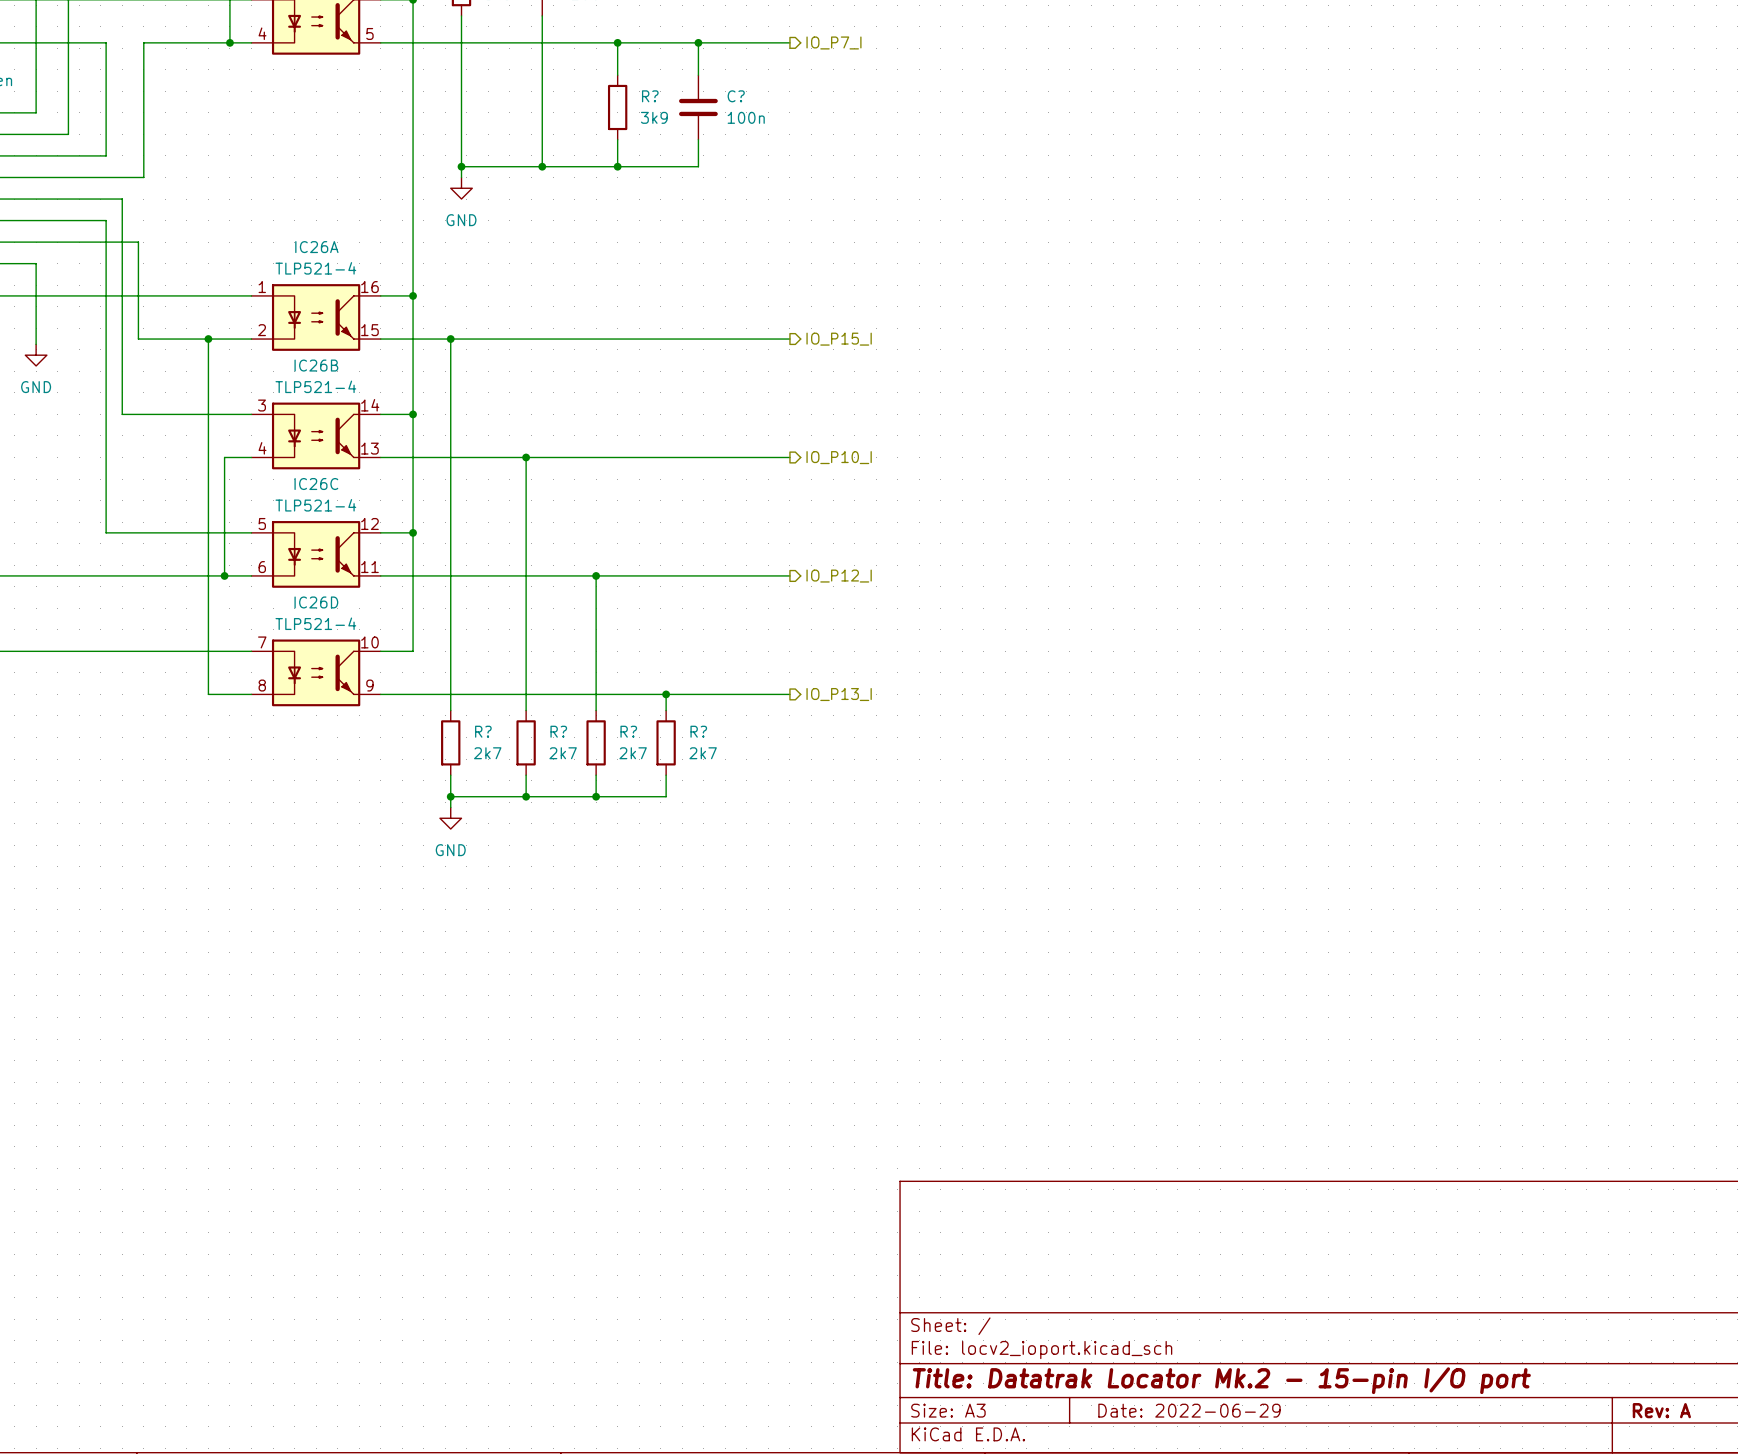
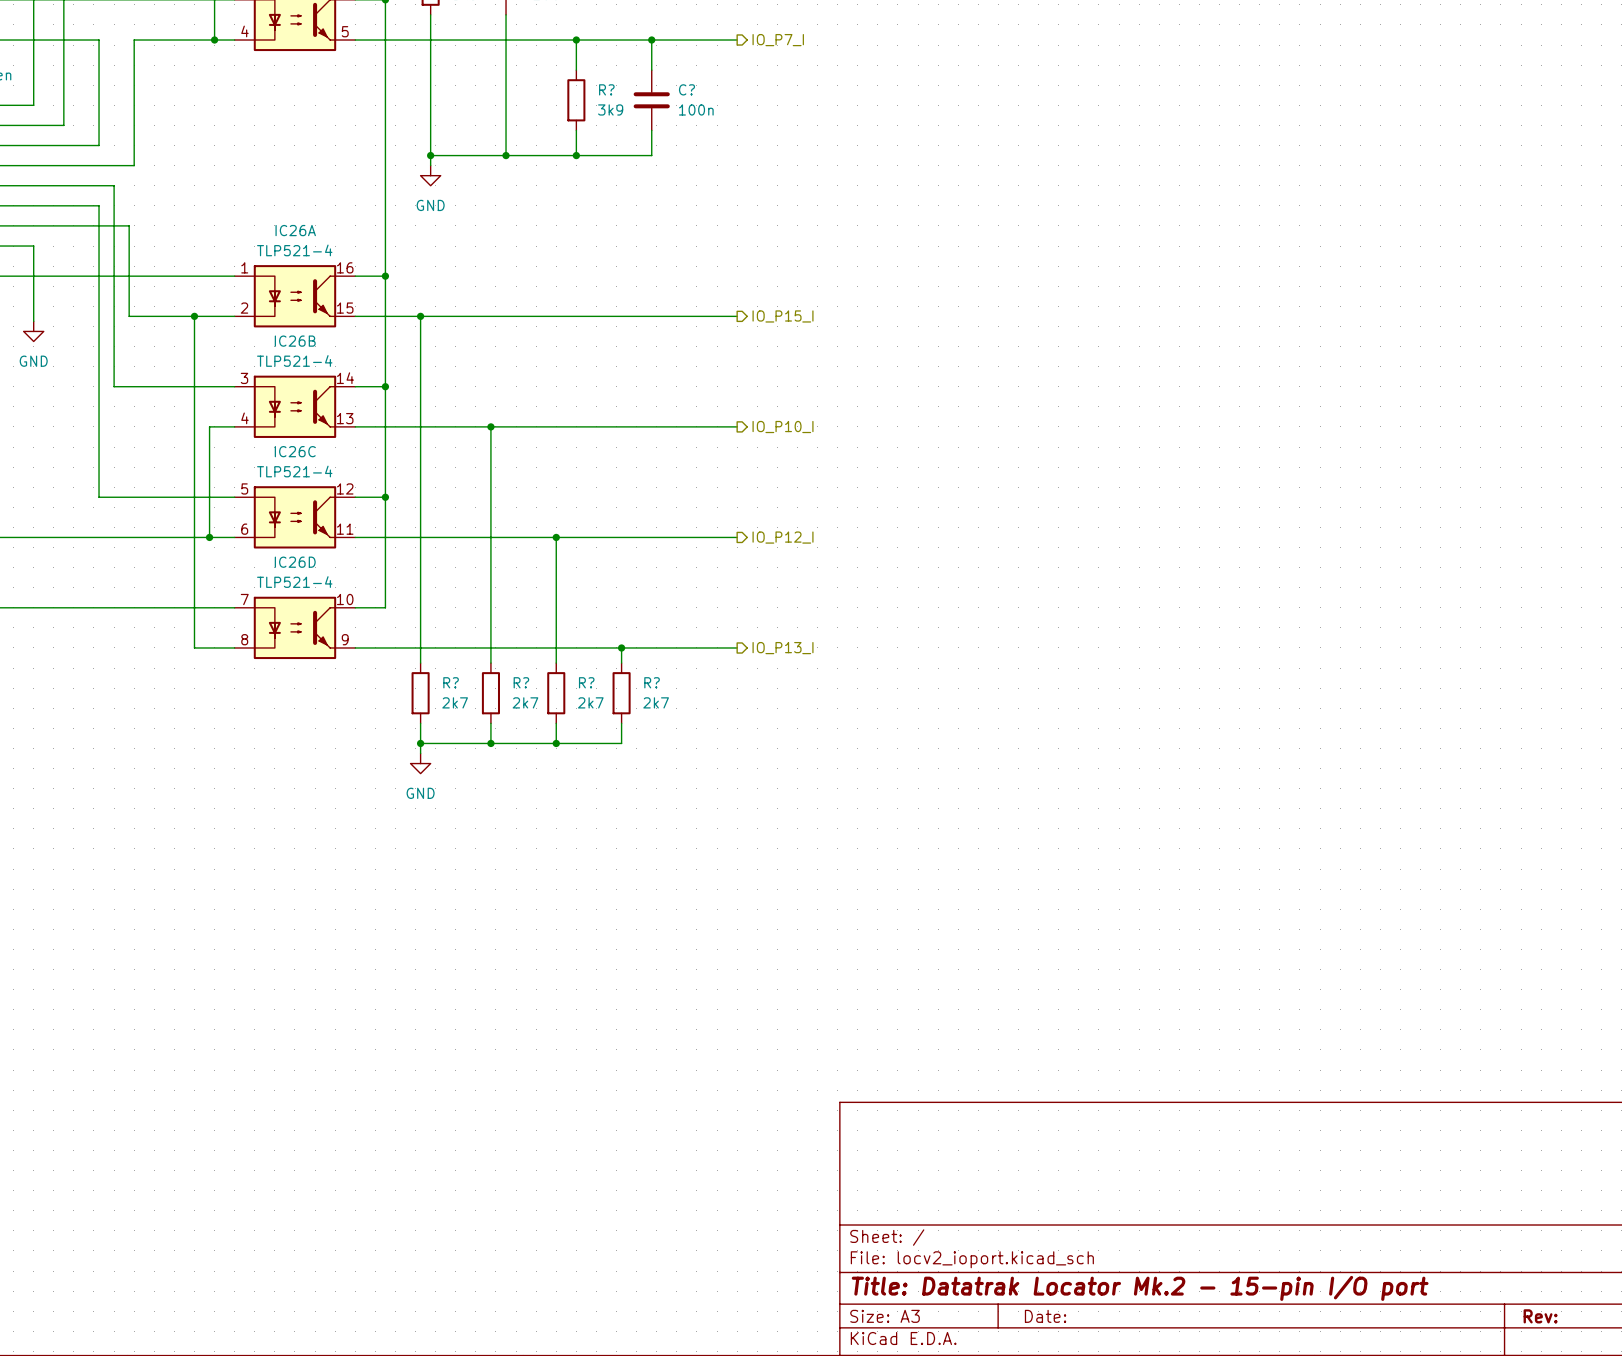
title block: Date: 2022-06-29 (1189, 1410) -> Date: (1045, 1316)
title block: Rev: A (1661, 1410) -> Rev: (1540, 1316)

